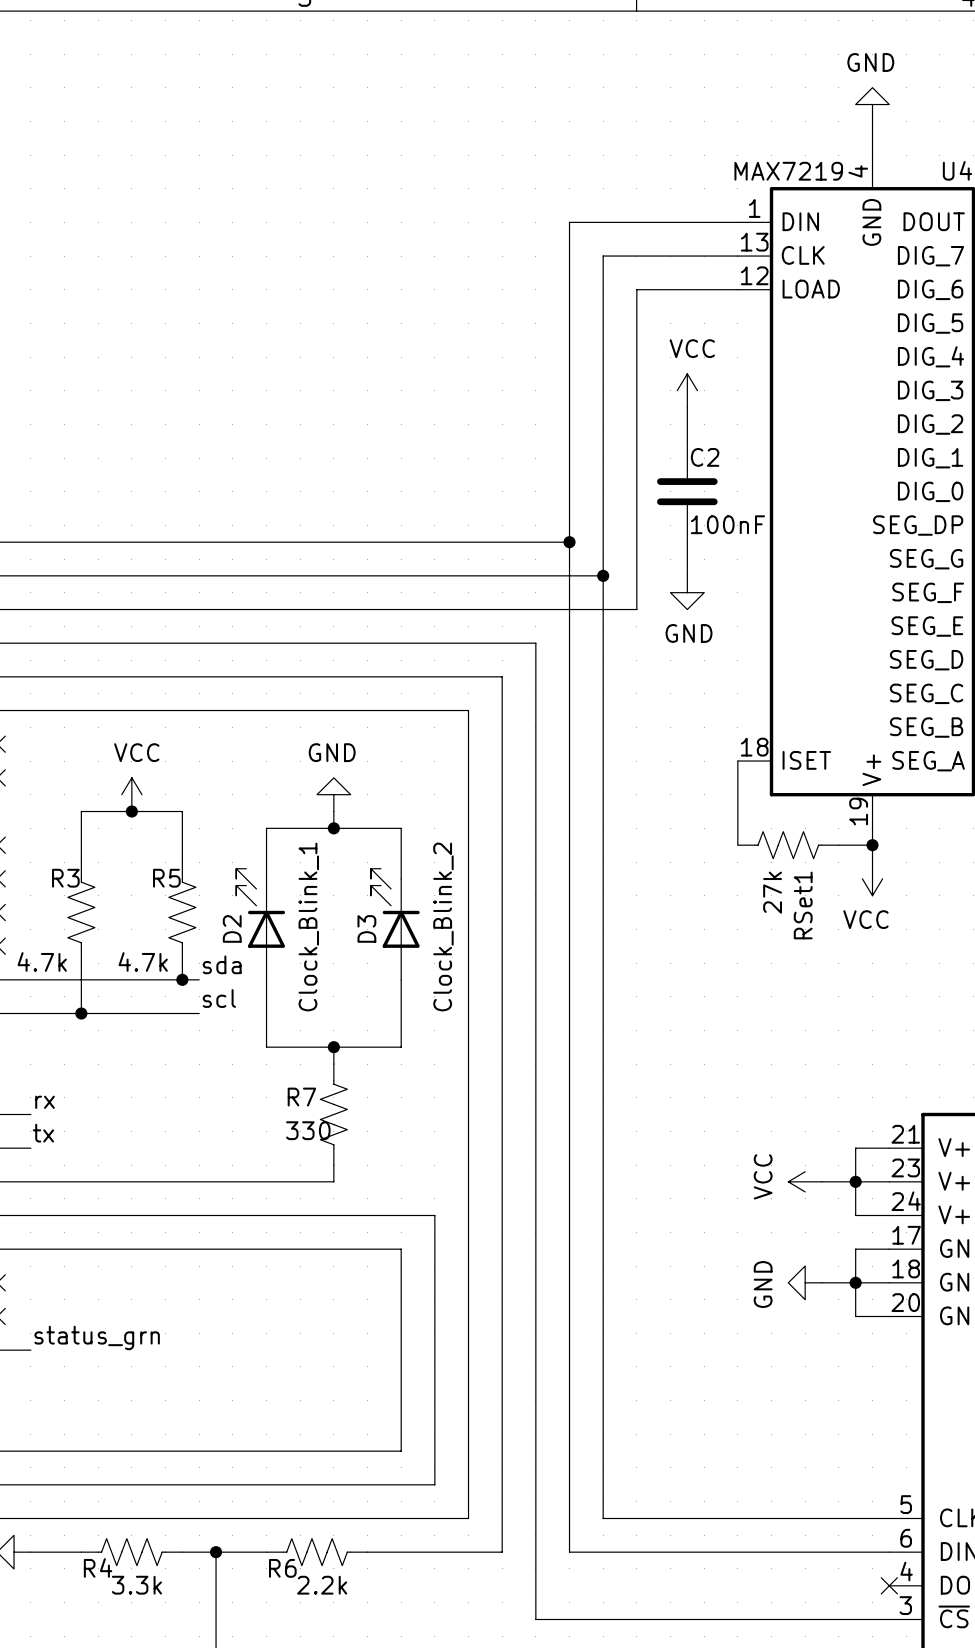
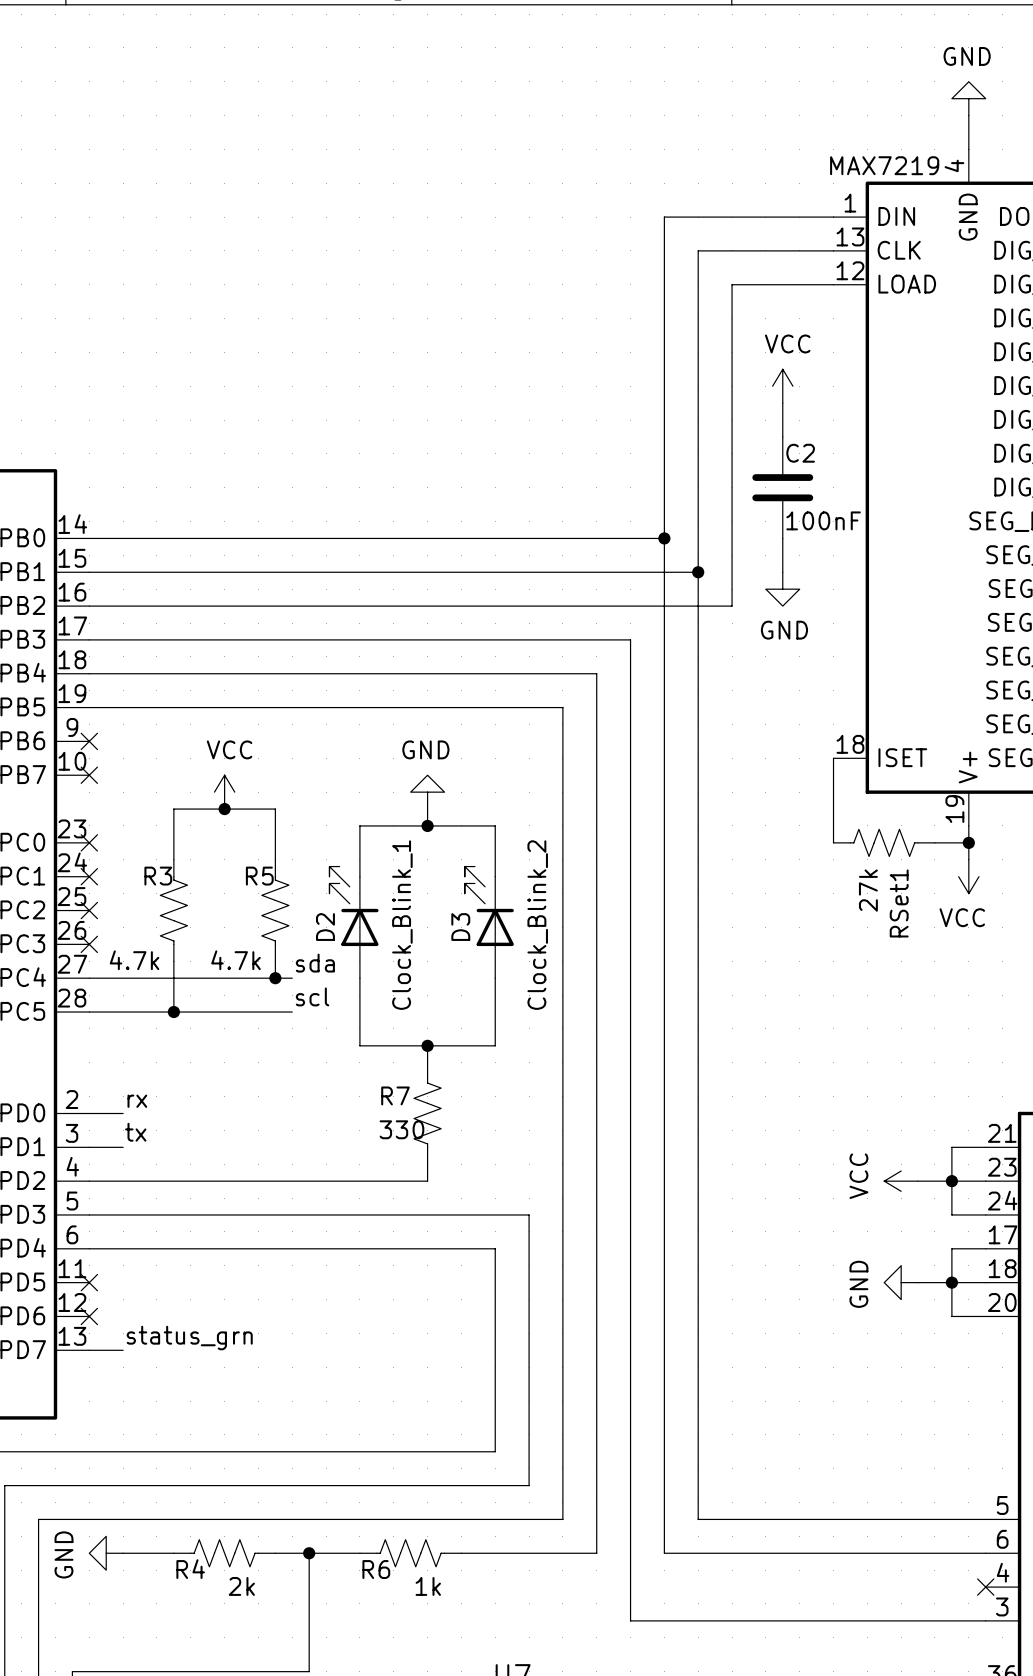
R4 value: 3.3k (136, 1585) -> 2k (241, 1586)
R6 value: 2.2k (322, 1585) -> 1k (428, 1586)

